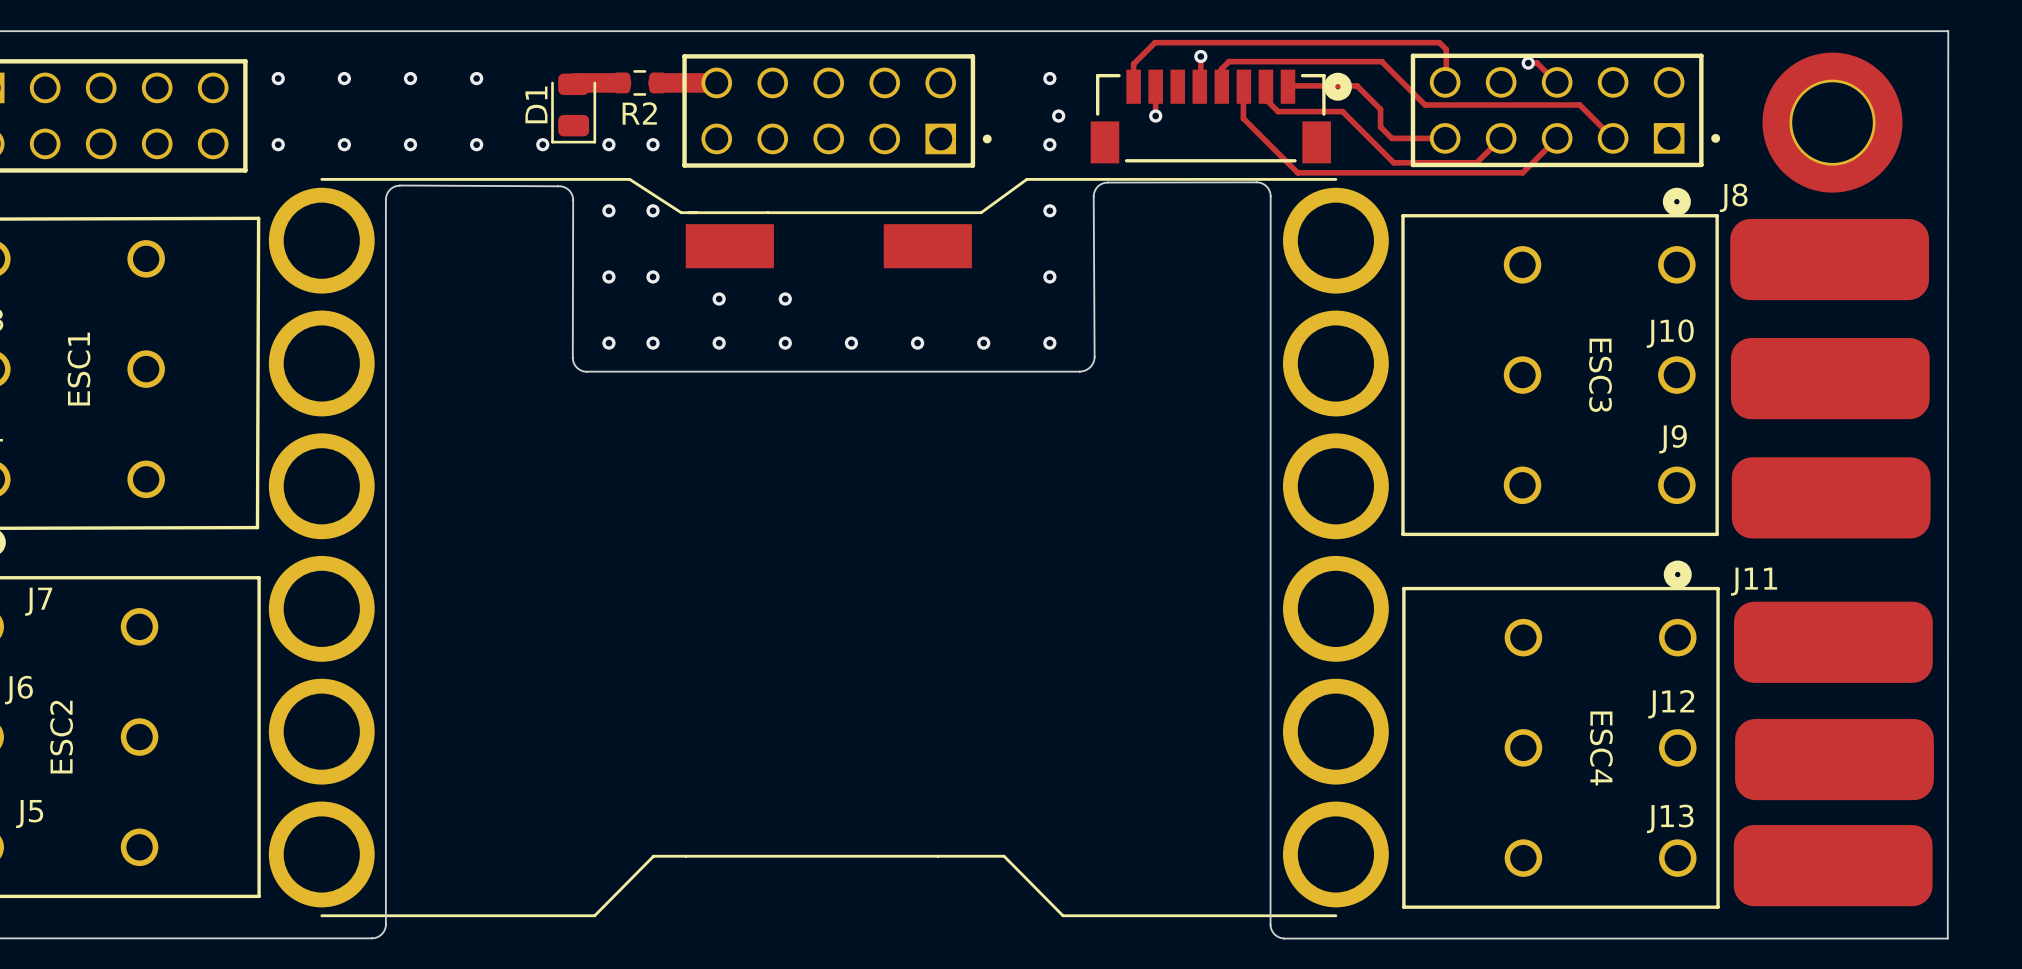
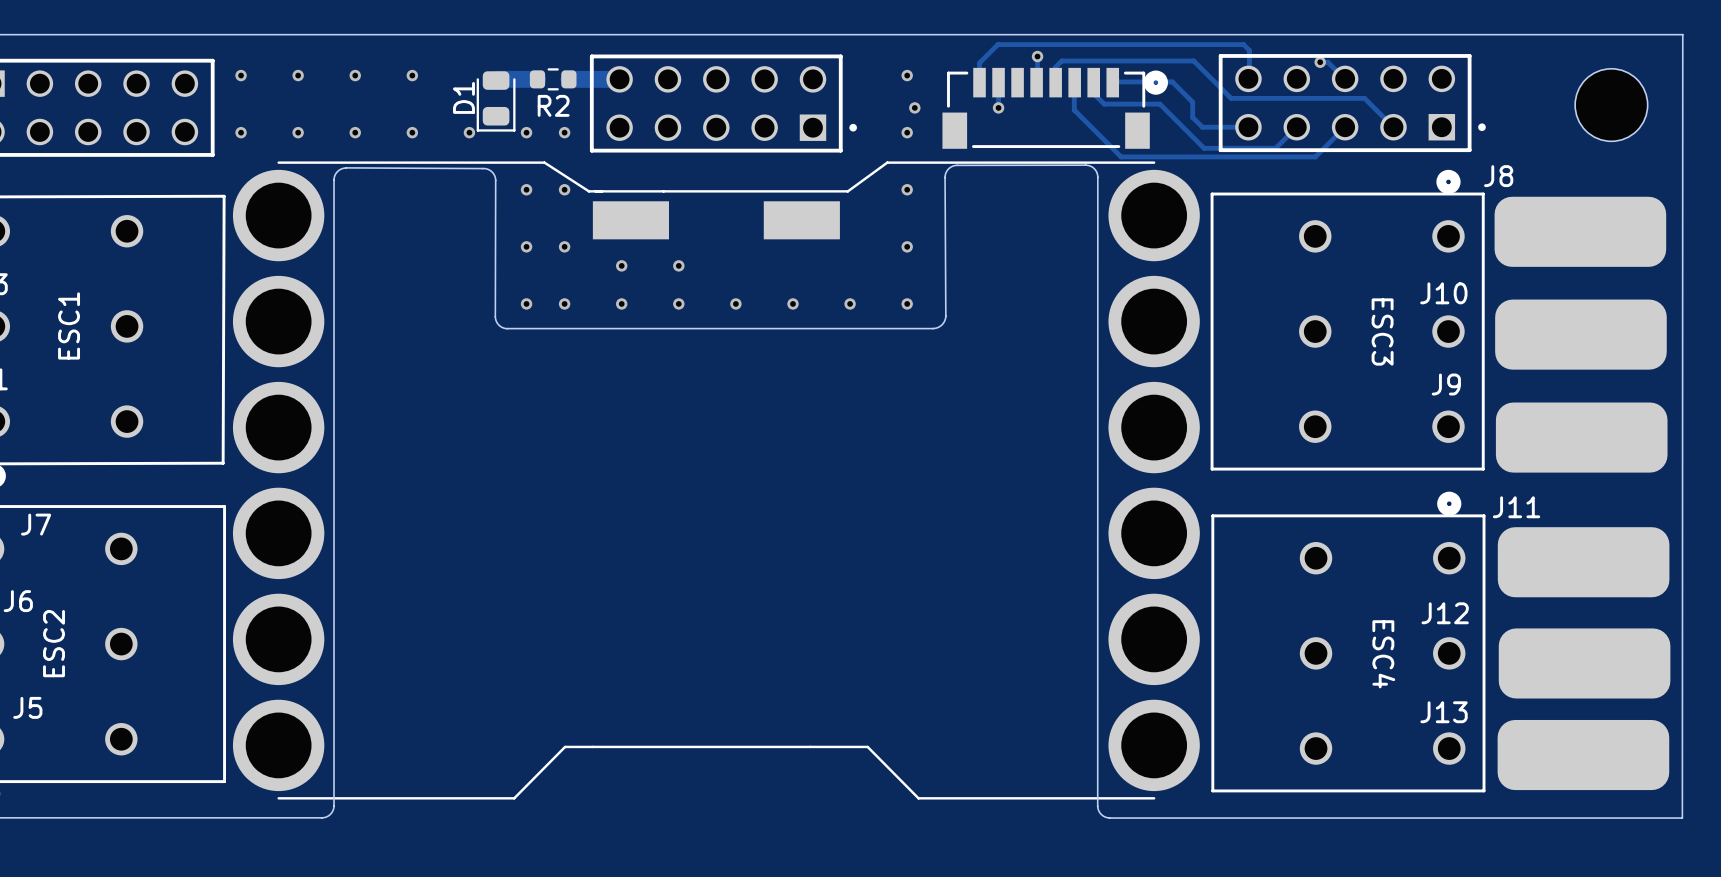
part: none -> (1611, 105)
part: (1832, 122) -> none

